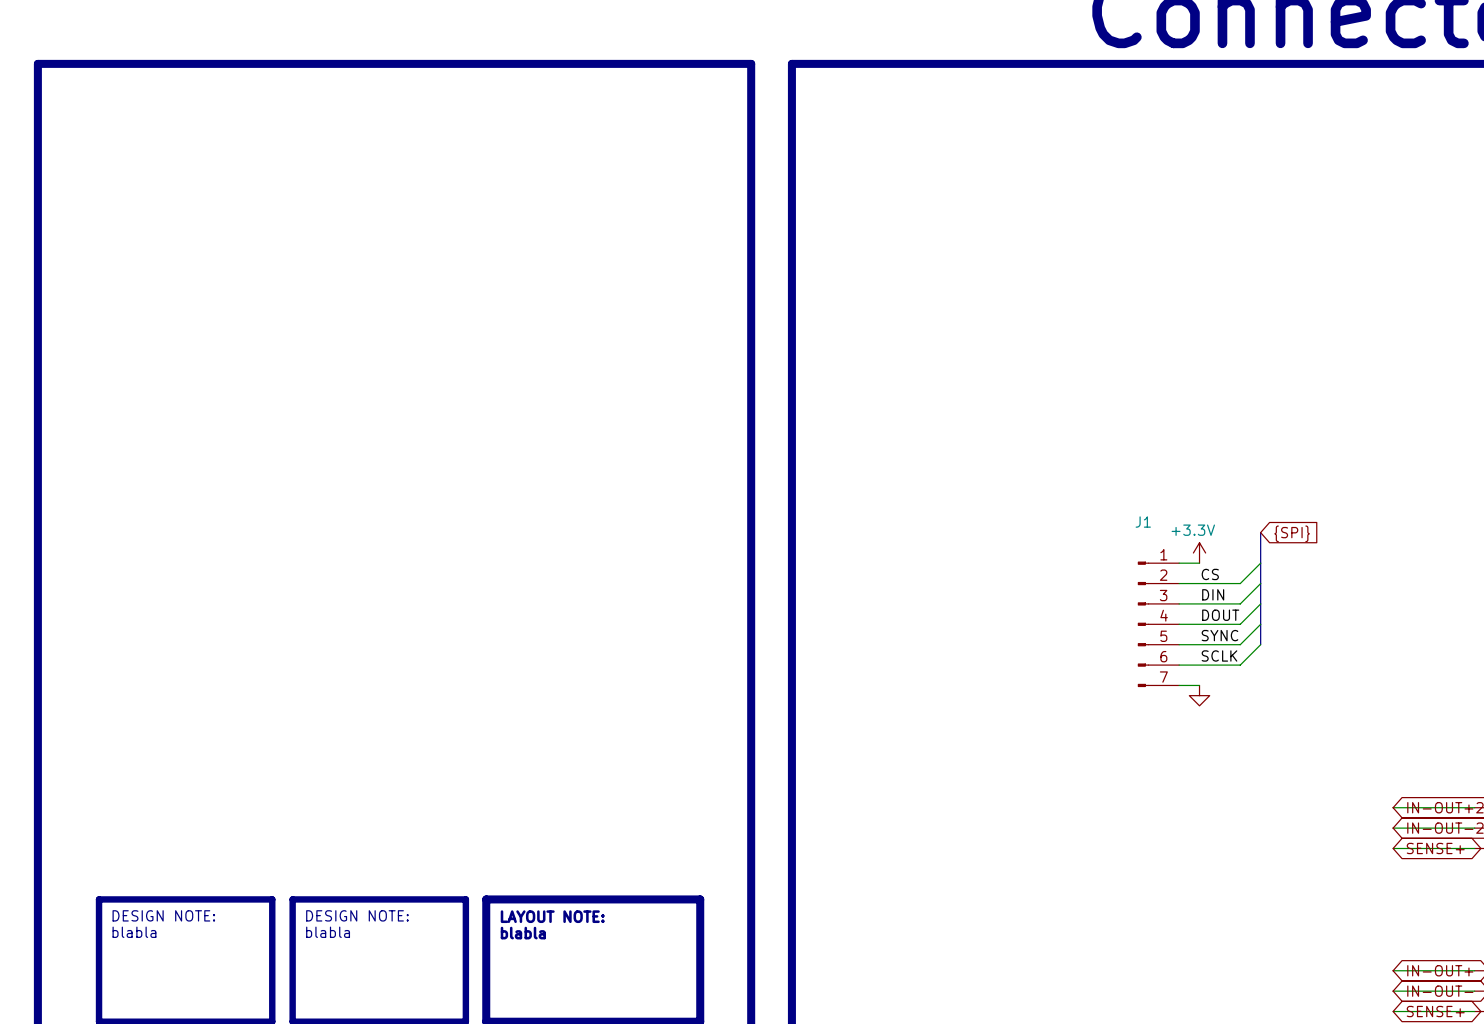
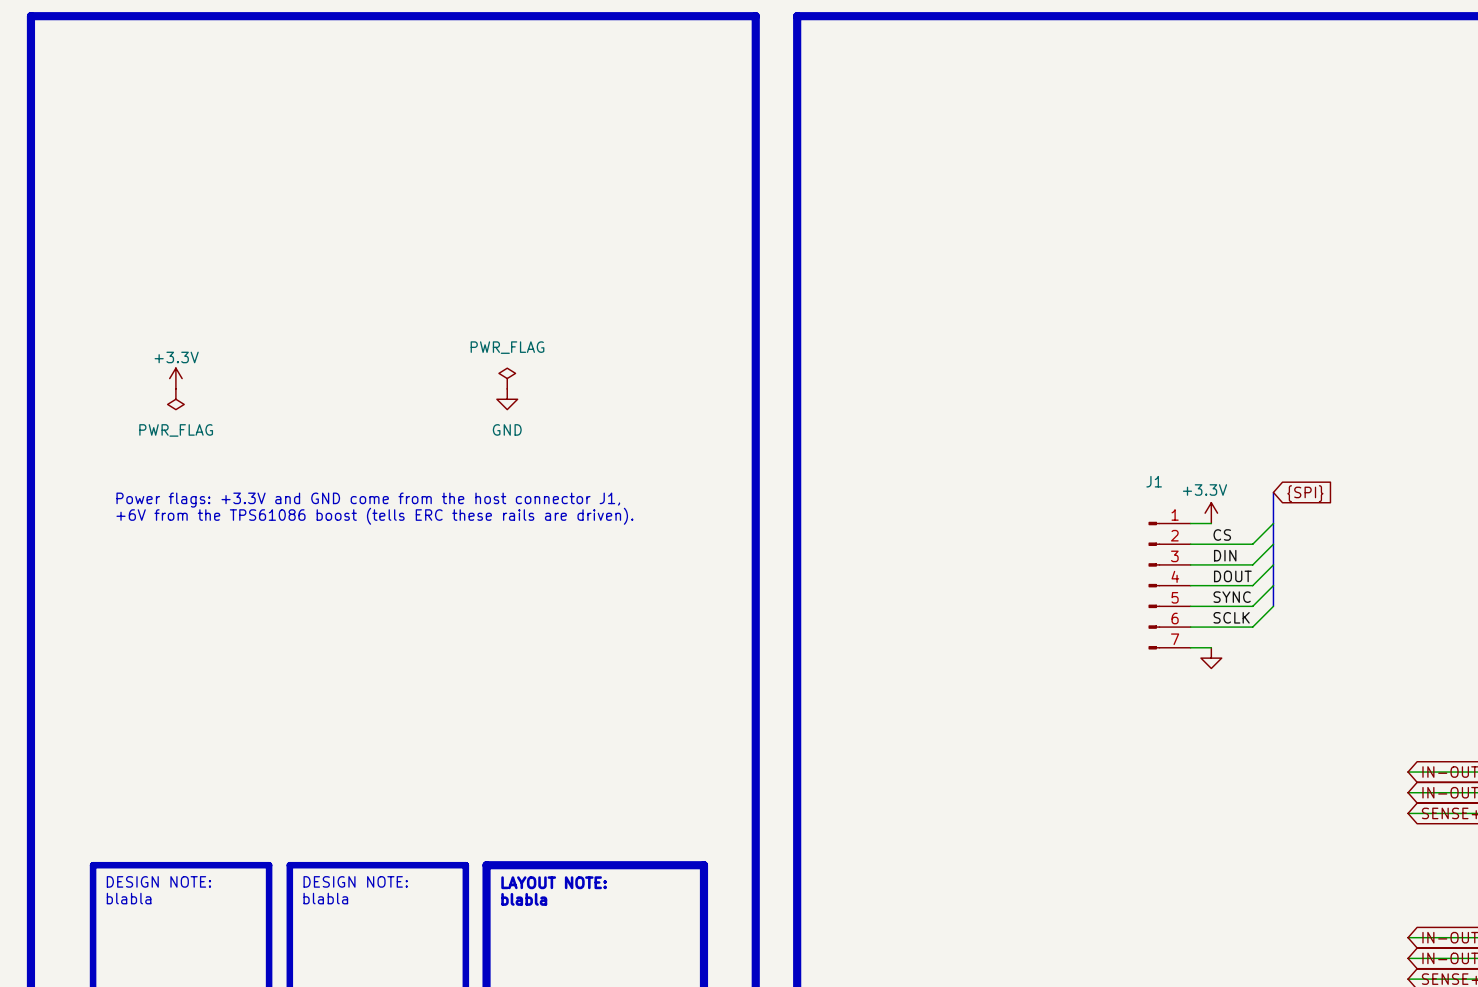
power symbol: none -> +3.3V (175, 378)
power symbol: none -> PWR_FLAG (507, 378)
power symbol: none -> PWR_FLAG (175, 399)
power symbol: none -> GND (507, 399)
text: none -> Power flags: +3.3V and GND come from the host connector J1, (368, 500)
text: none -> +6V from the TPS61086 boost (tells ERC these rails are driven). (374, 516)

